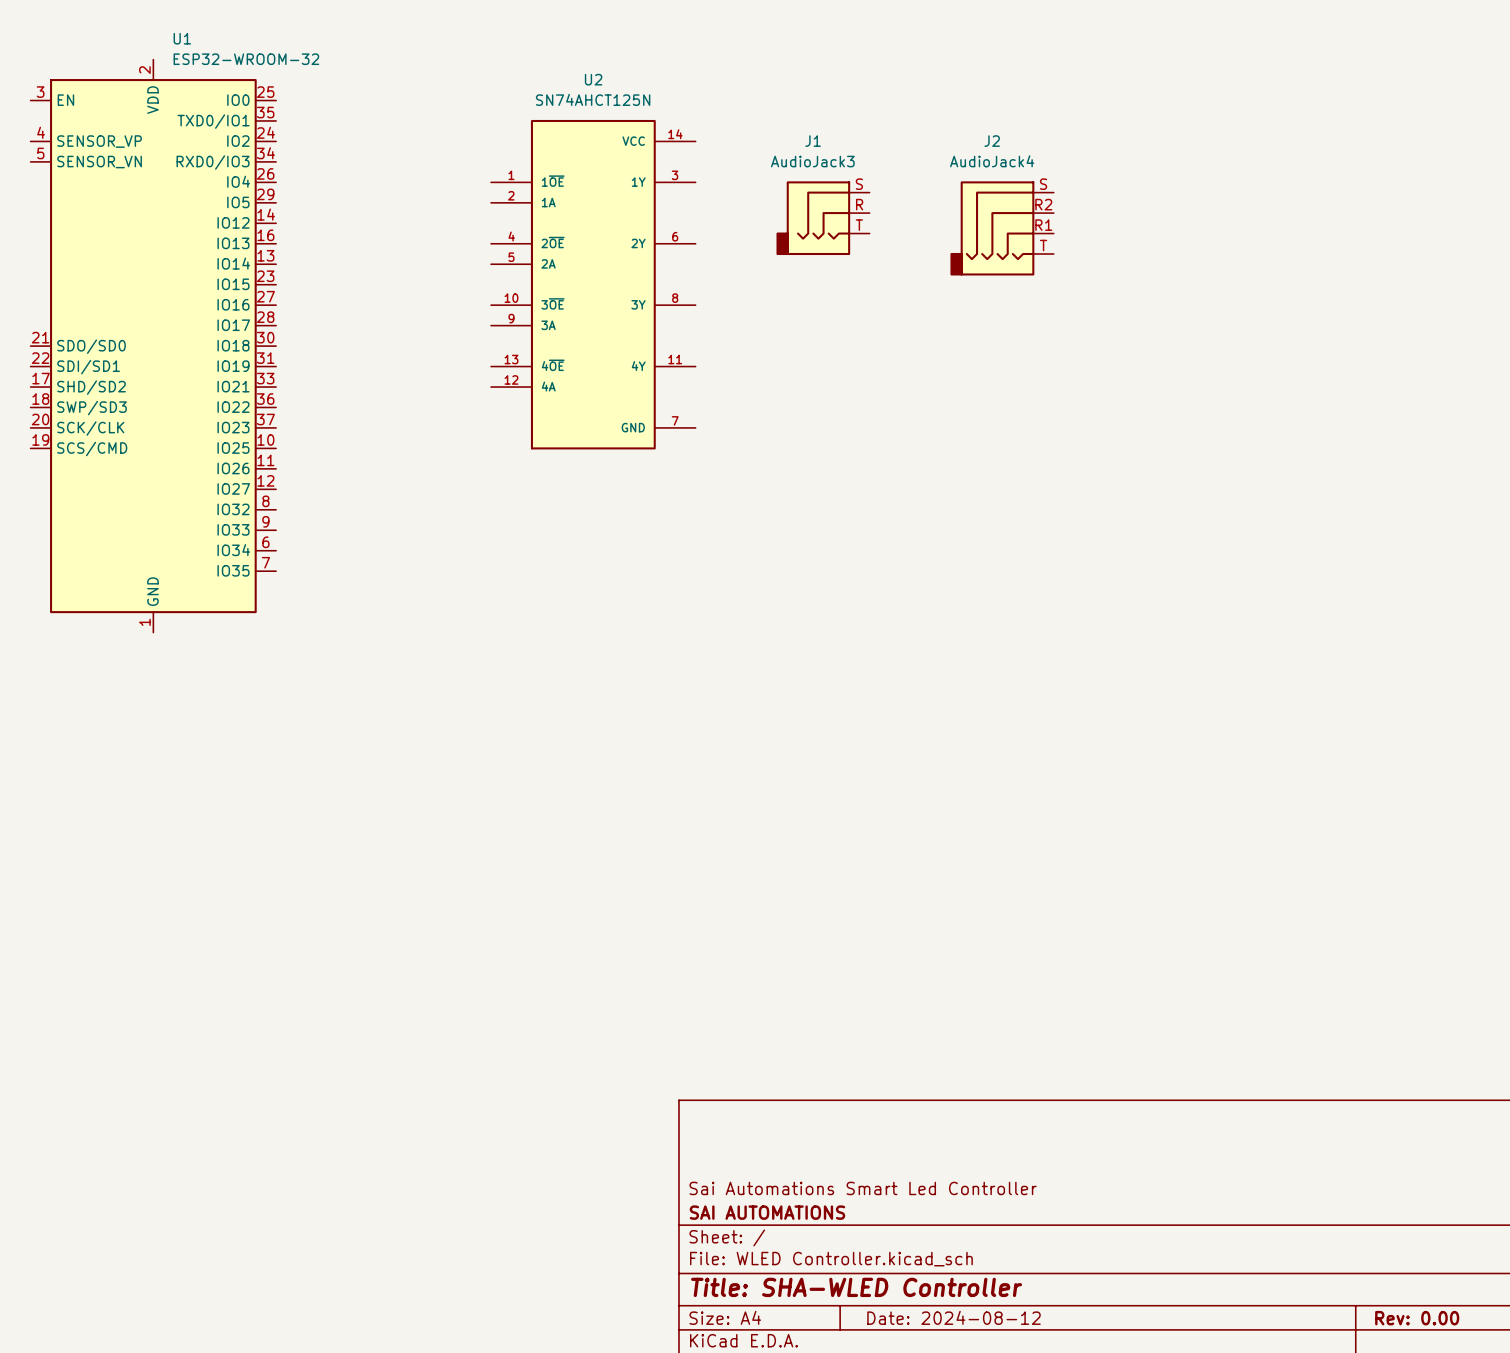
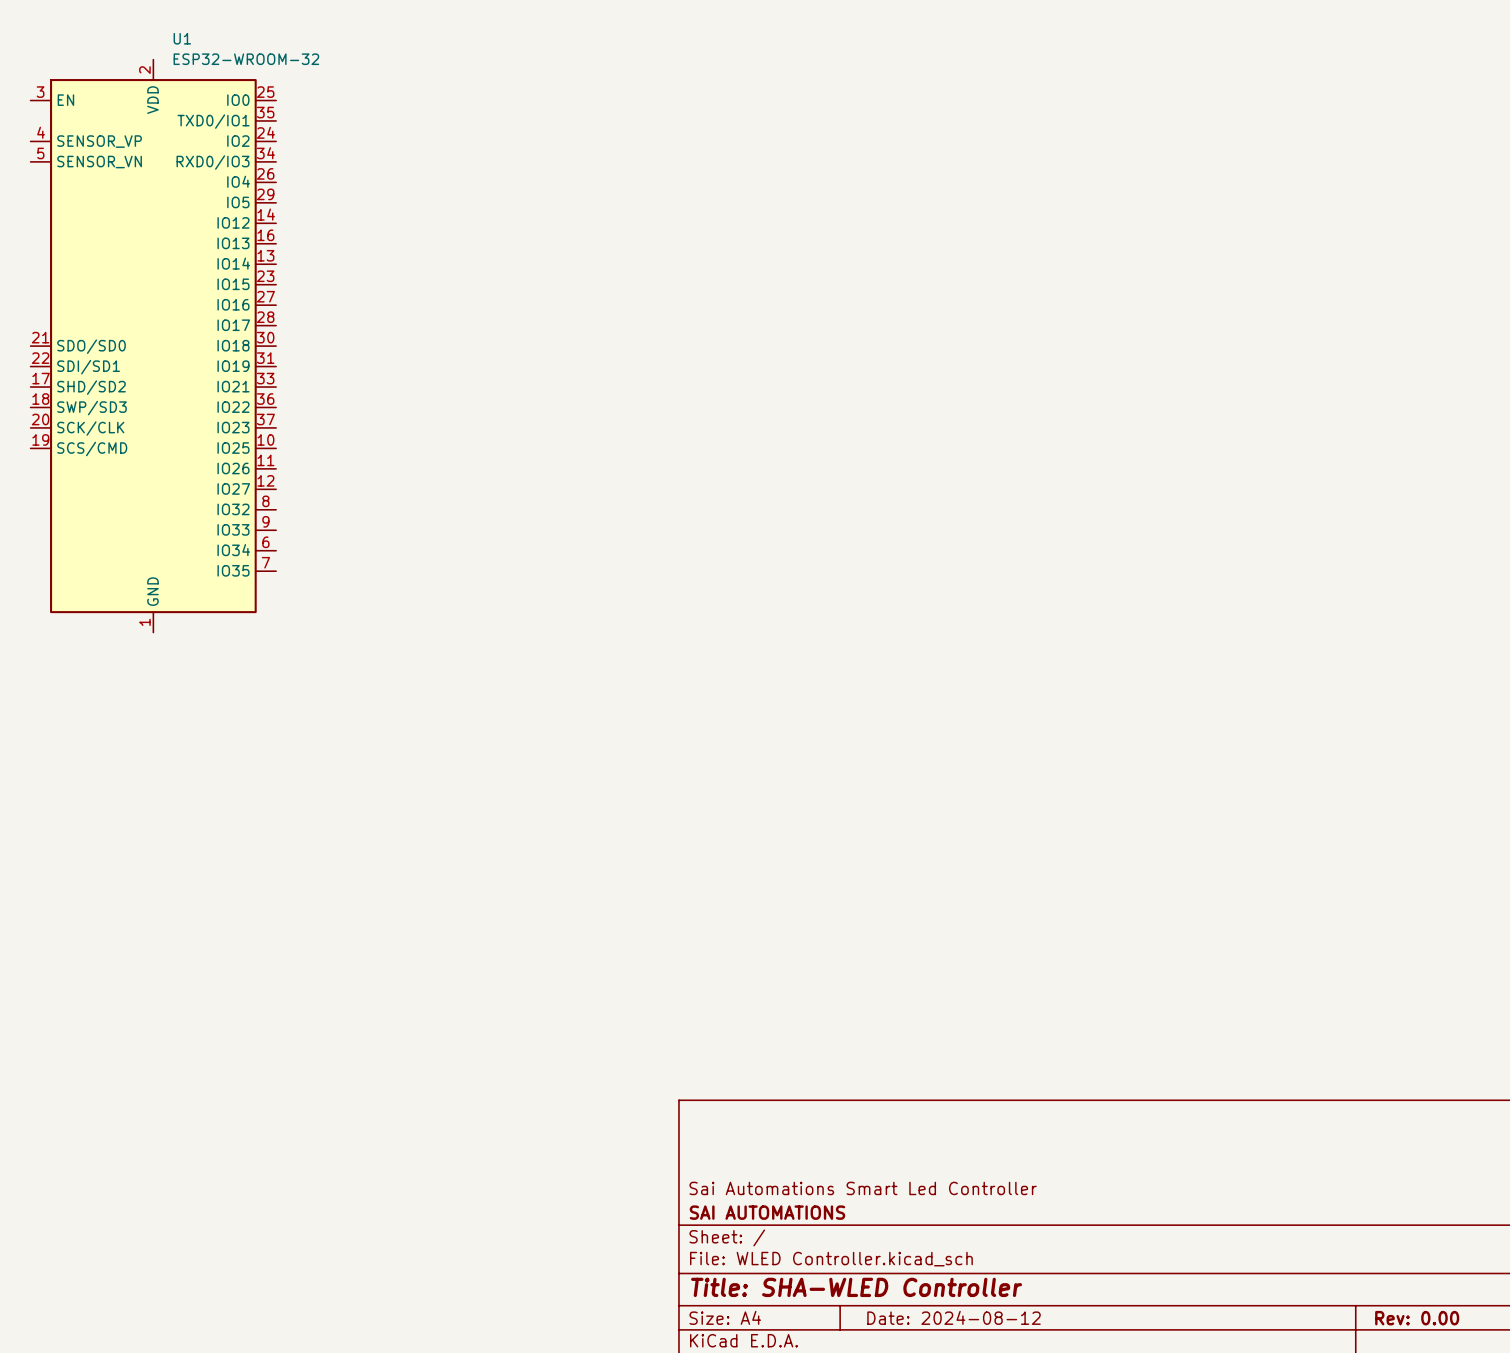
J1: AudioJack3 (823, 218) -> none
J2: AudioJack4 (1002, 228) -> none
U2: SN74AHCT125N (593, 284) -> none

